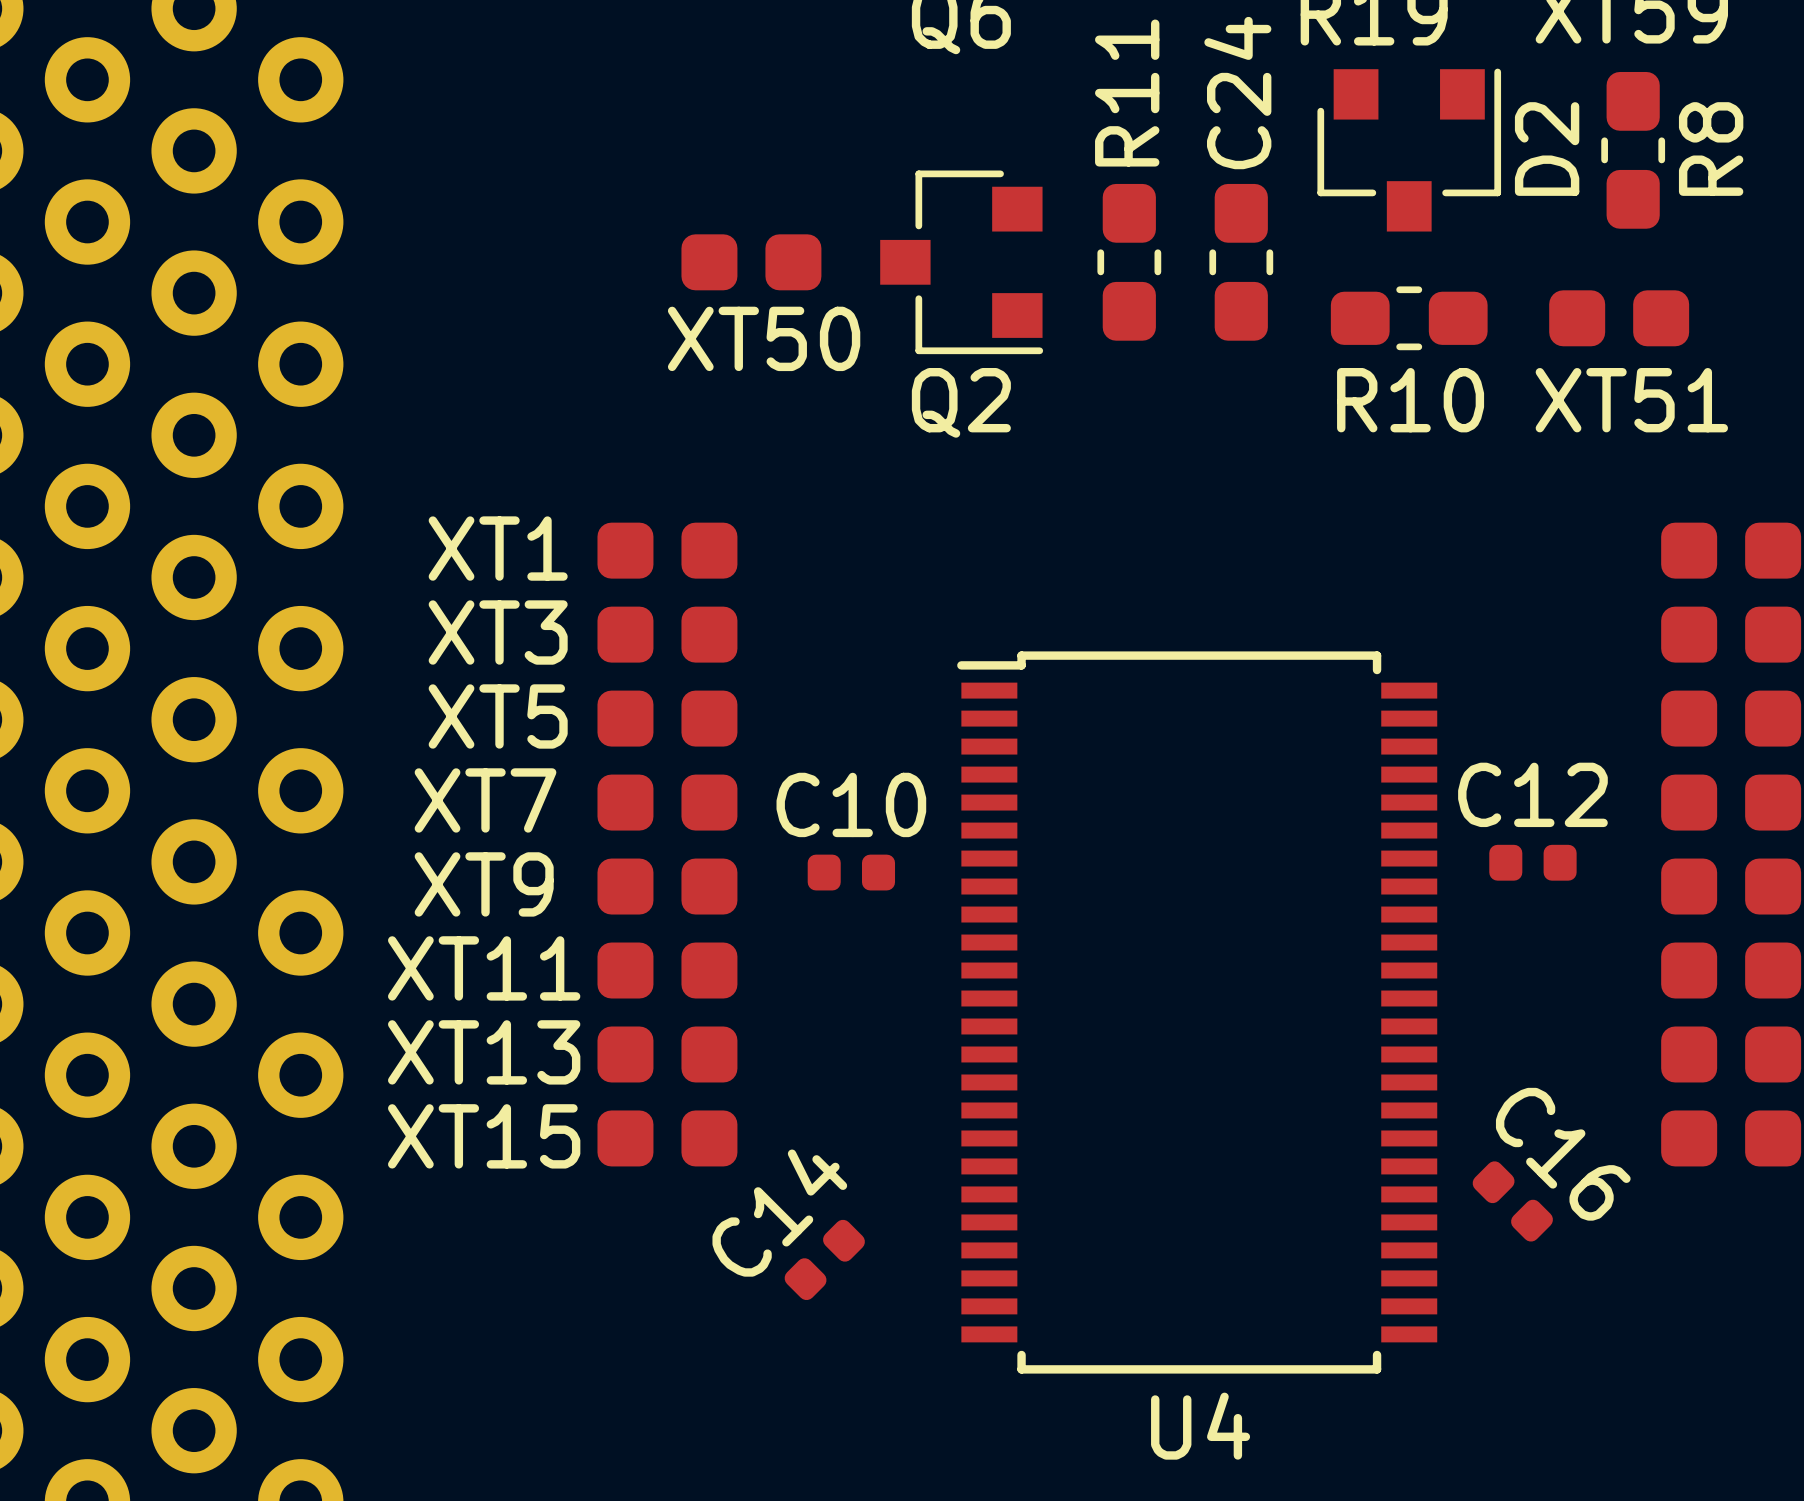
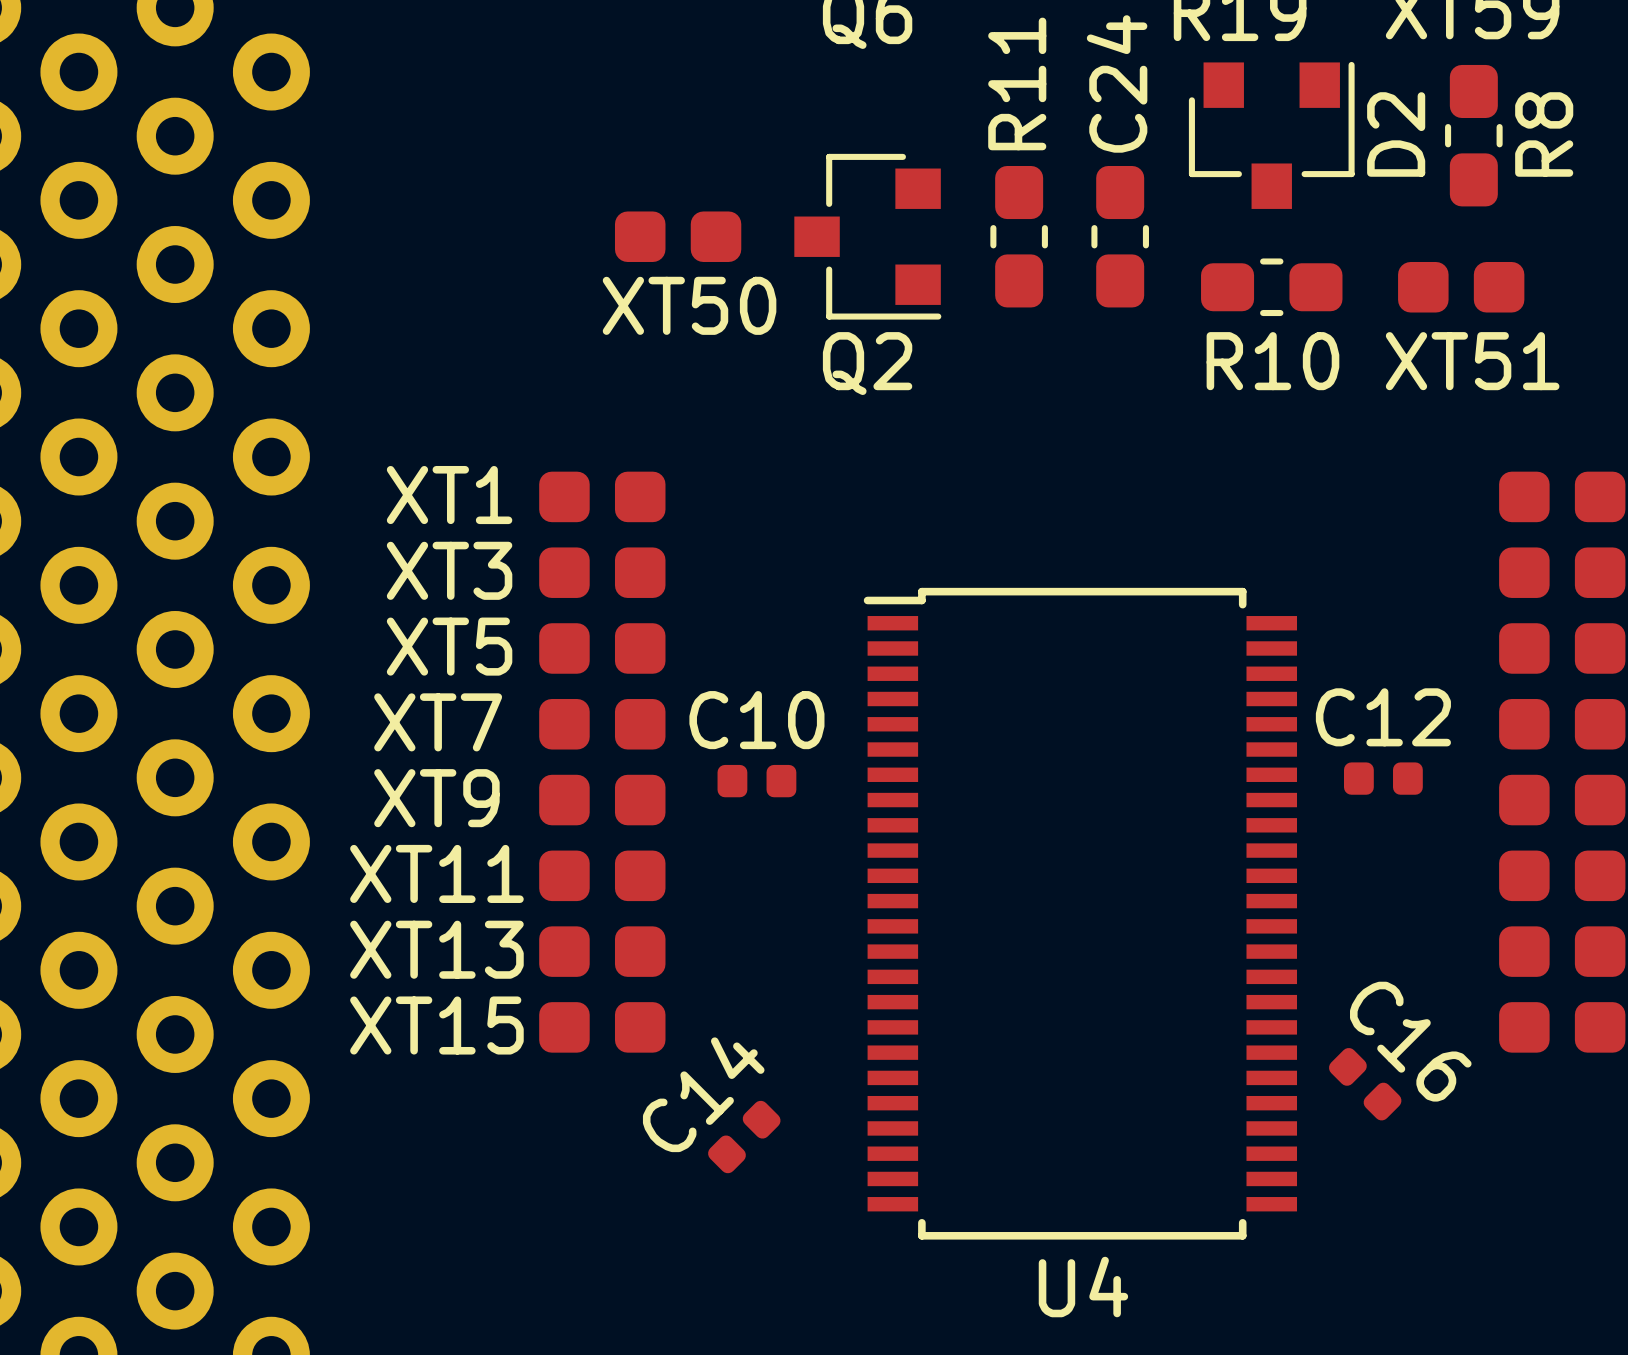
C10 position: (851, 872) -> (756, 781)

